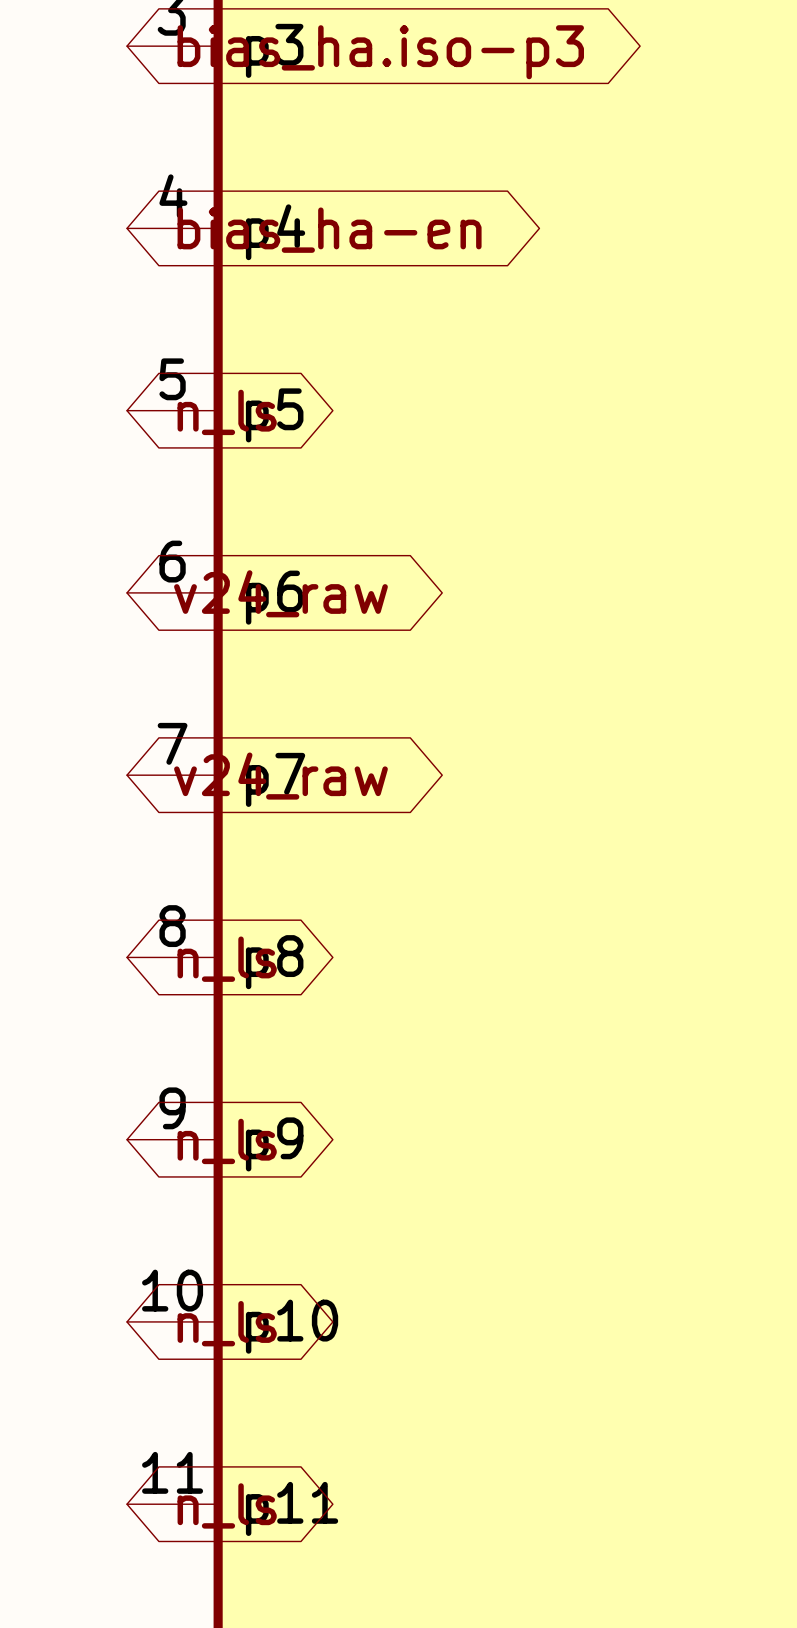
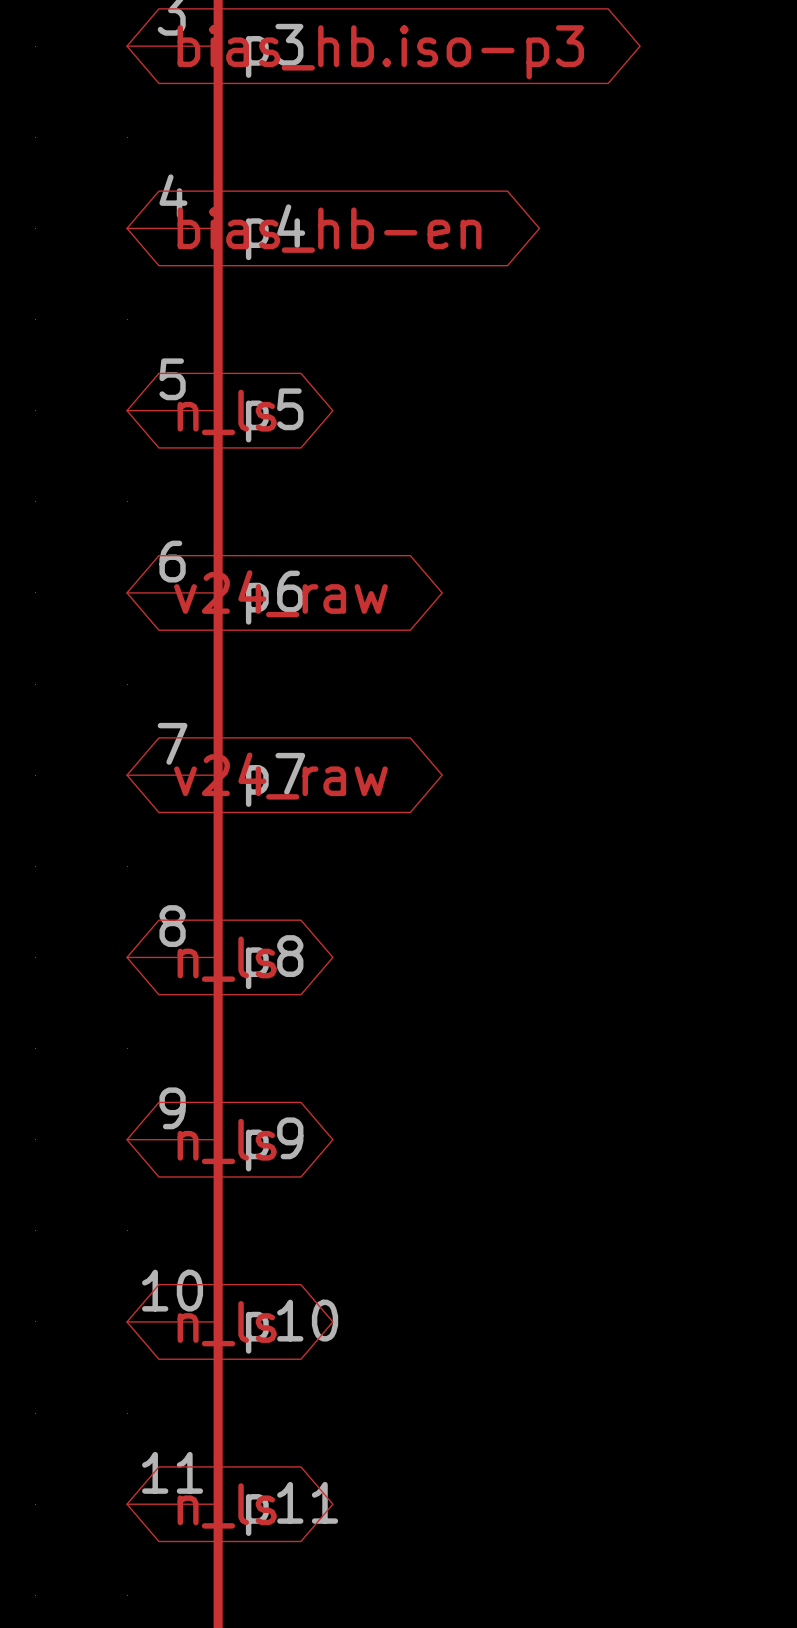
global label: bias_ha.iso-p3 (380, 52) -> bias_hb.iso-p3 (380, 52)
global label: bias_ha-en (329, 230) -> bias_hb-en (329, 230)

